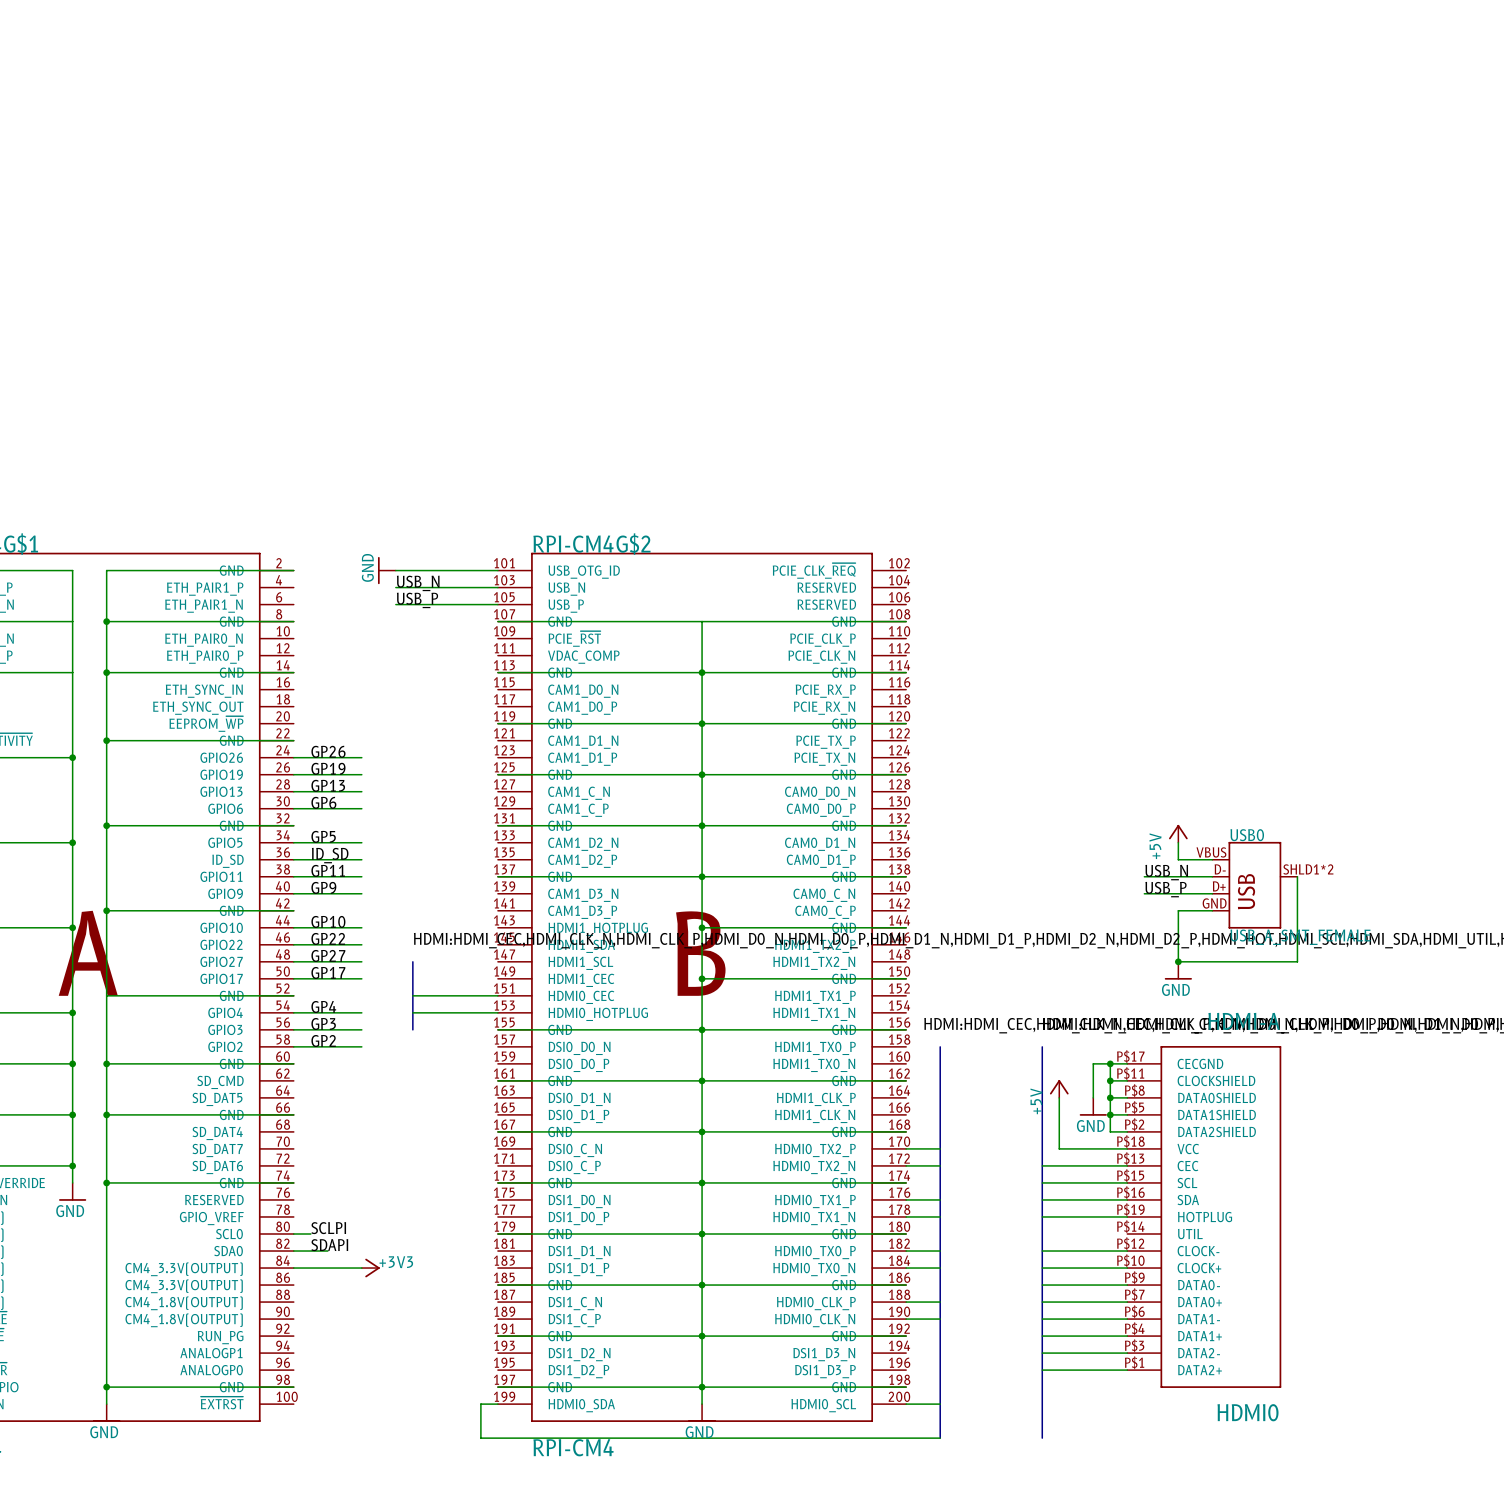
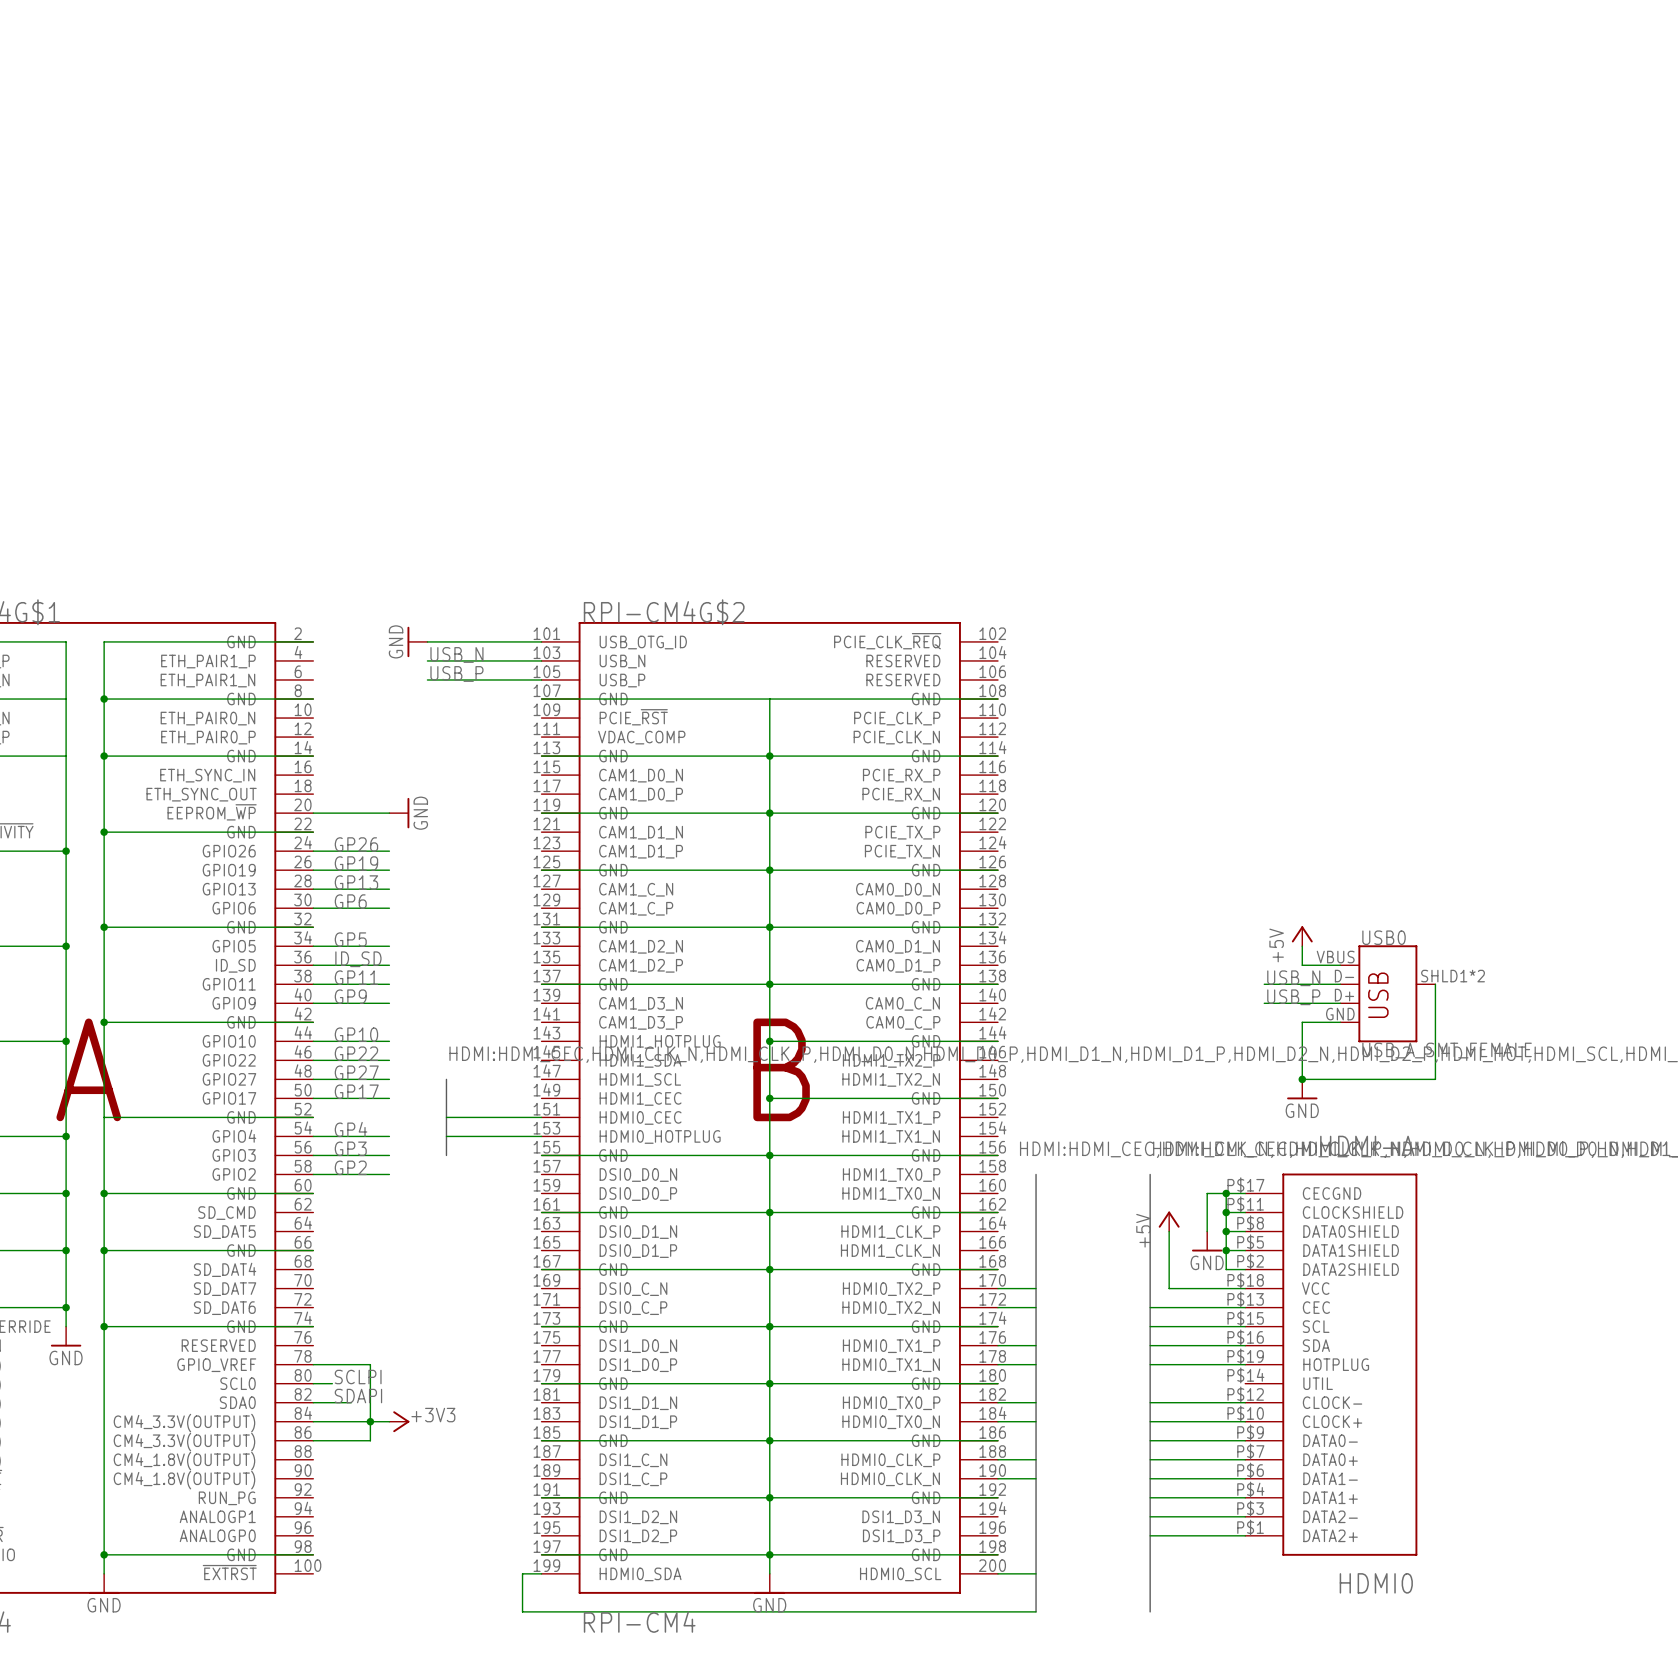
wire: none -> (313, 813) (389, 813)
power symbol: none -> GND (399, 813)
wire: none -> (313, 1364) (370, 1364) (370, 1440) (313, 1440)
junction: none -> (370, 1421)

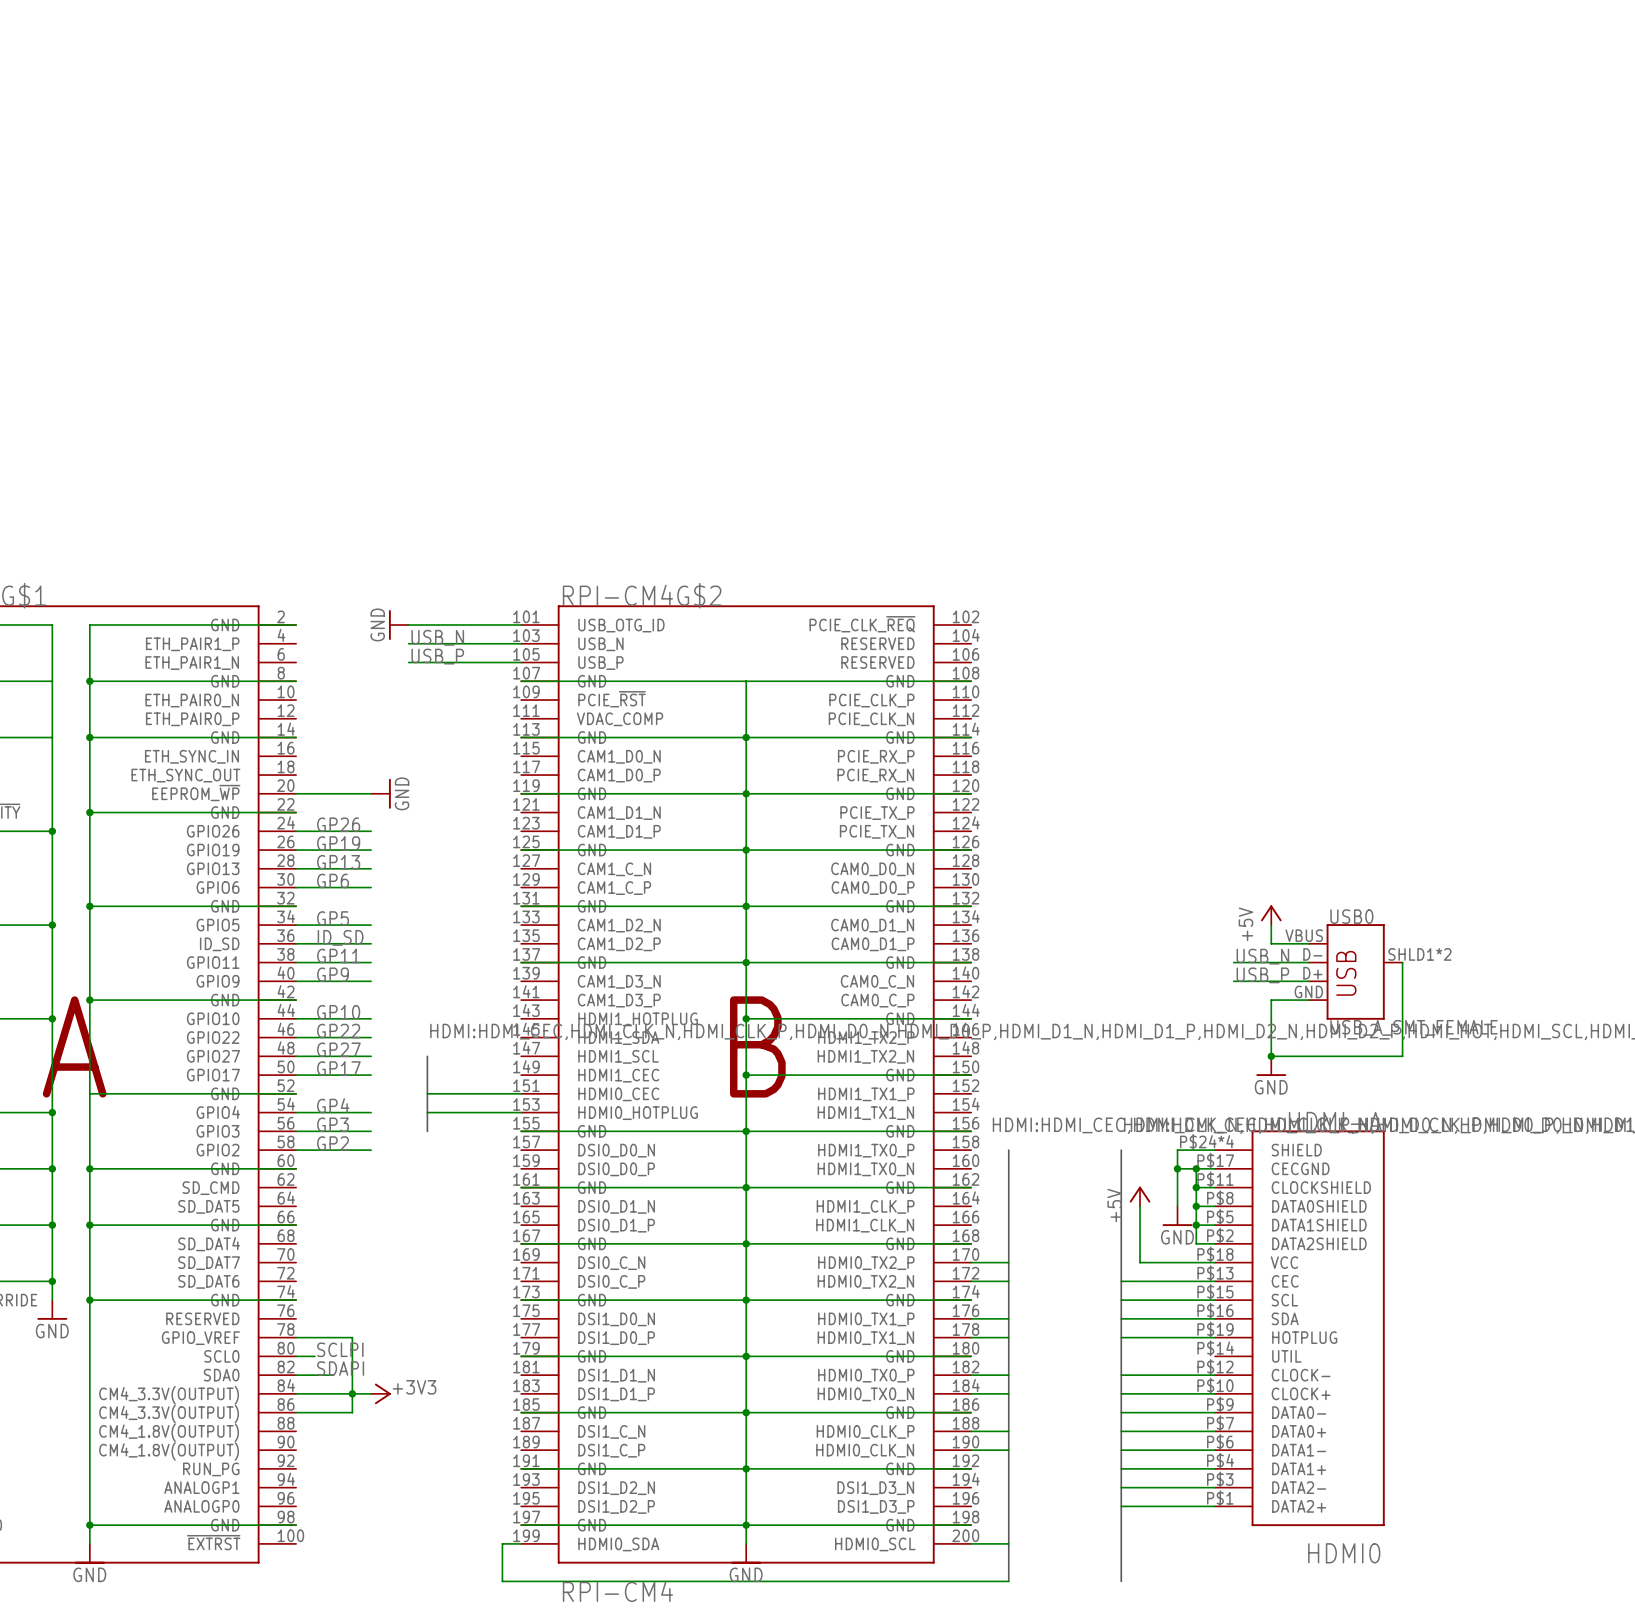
HDMI0 symbol: [1245, 1173, 1418, 1556] -> [1215, 1130, 1385, 1527]
wire: none -> (1215, 1150) (1177, 1150) (1177, 1168)
junction: none -> (1177, 1168)

